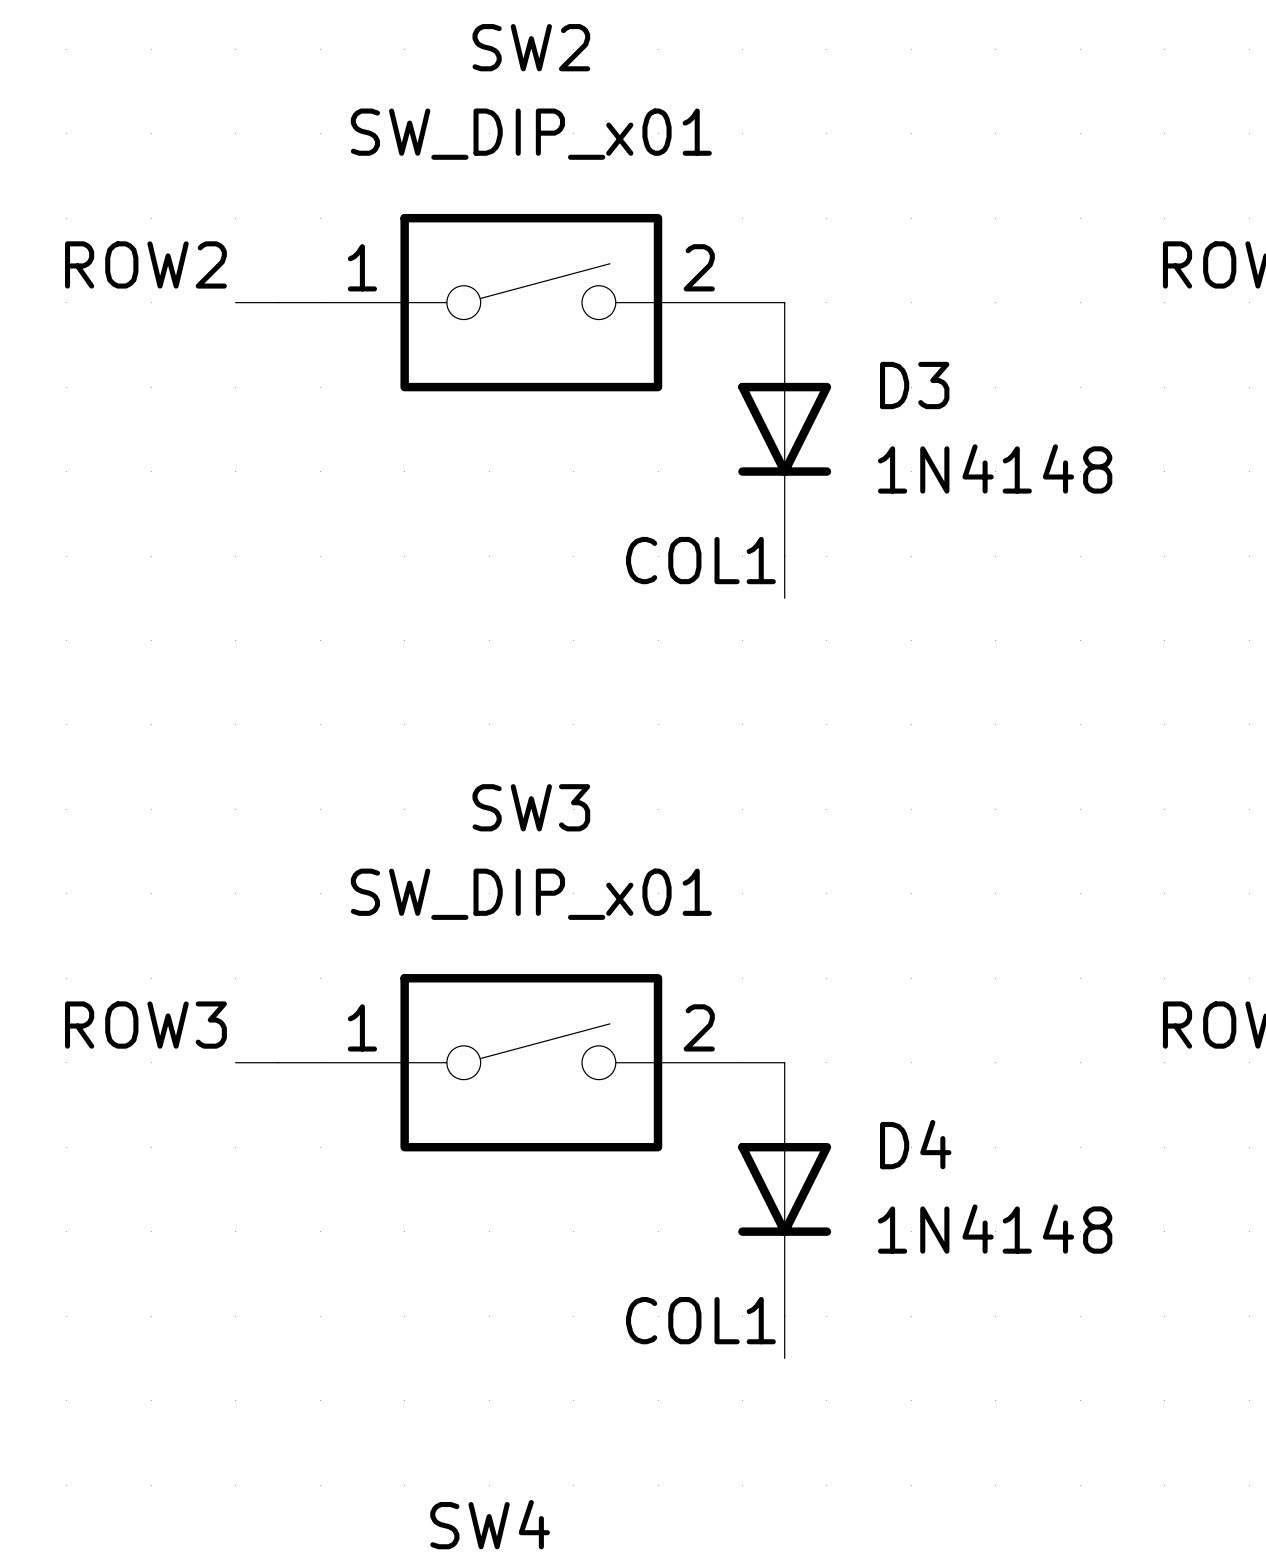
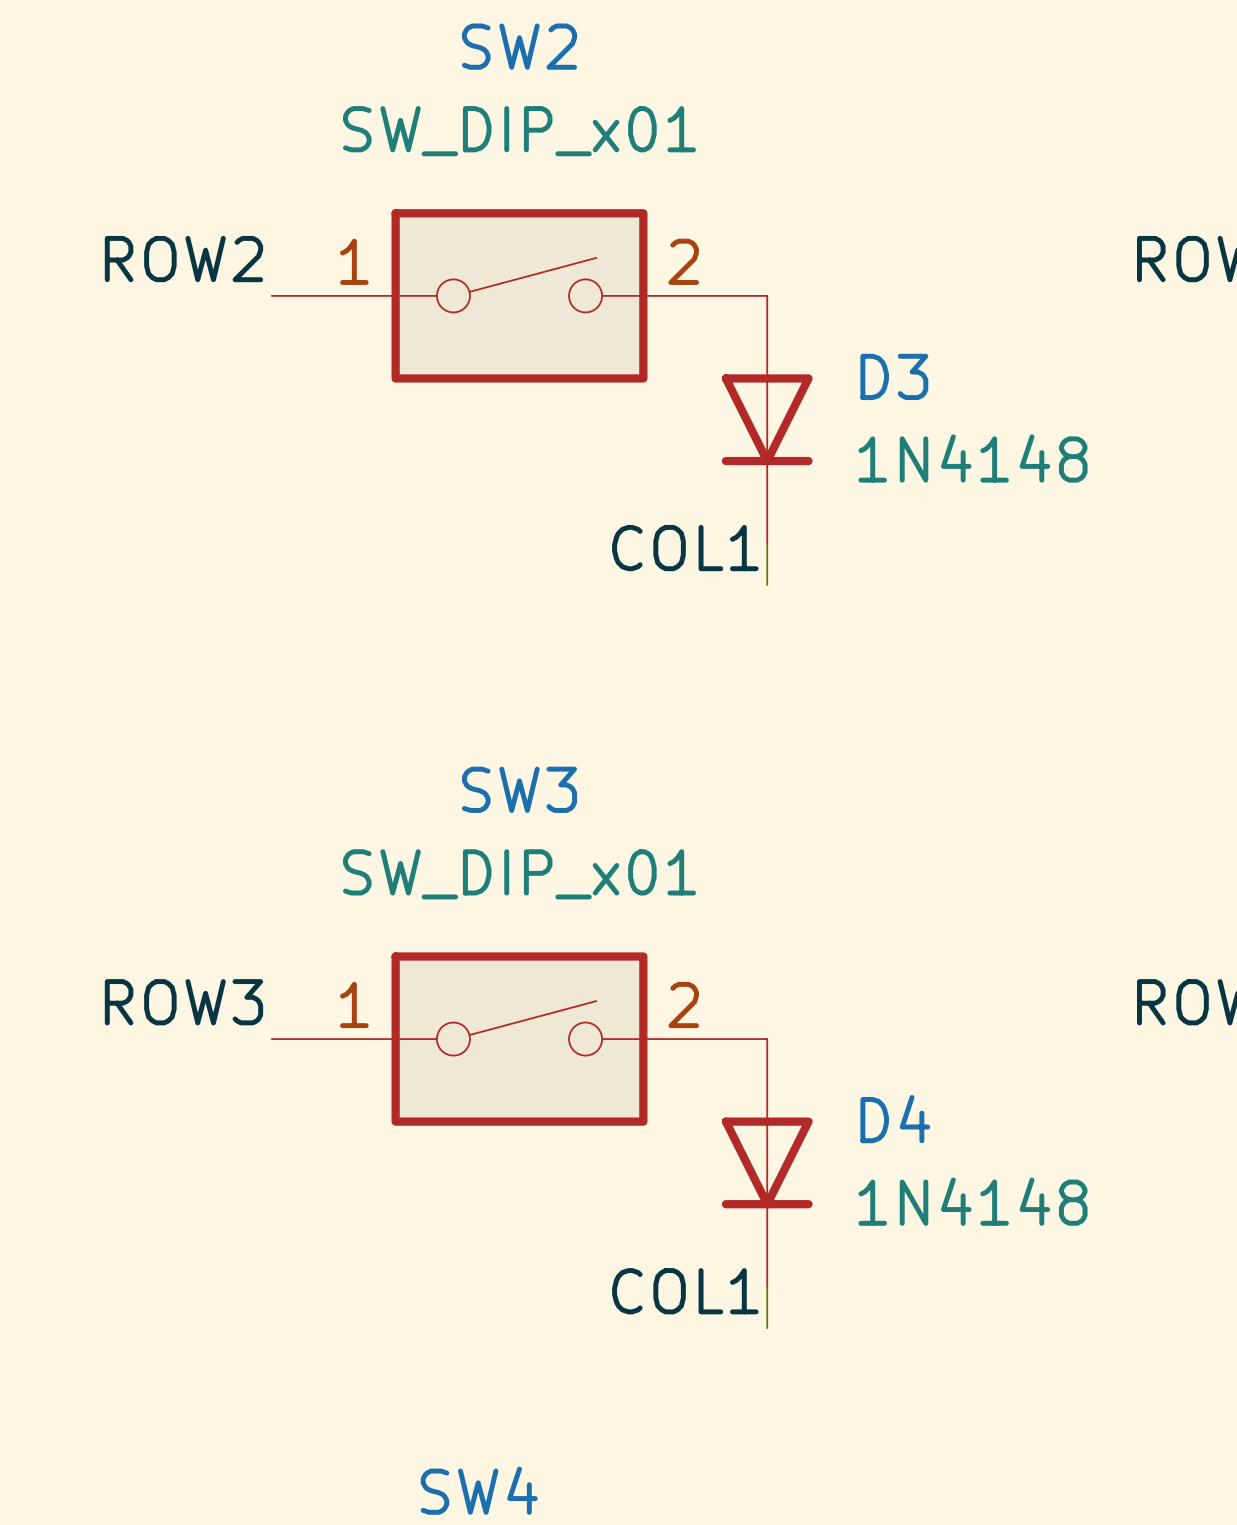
label position: ROW2 (145, 264) -> ROW2 (183, 259)
wire: (235, 302) (277, 302) -> none
label position: ROW3 (145, 1025) -> ROW3 (183, 1002)
wire: (235, 1062) (277, 1062) -> none

